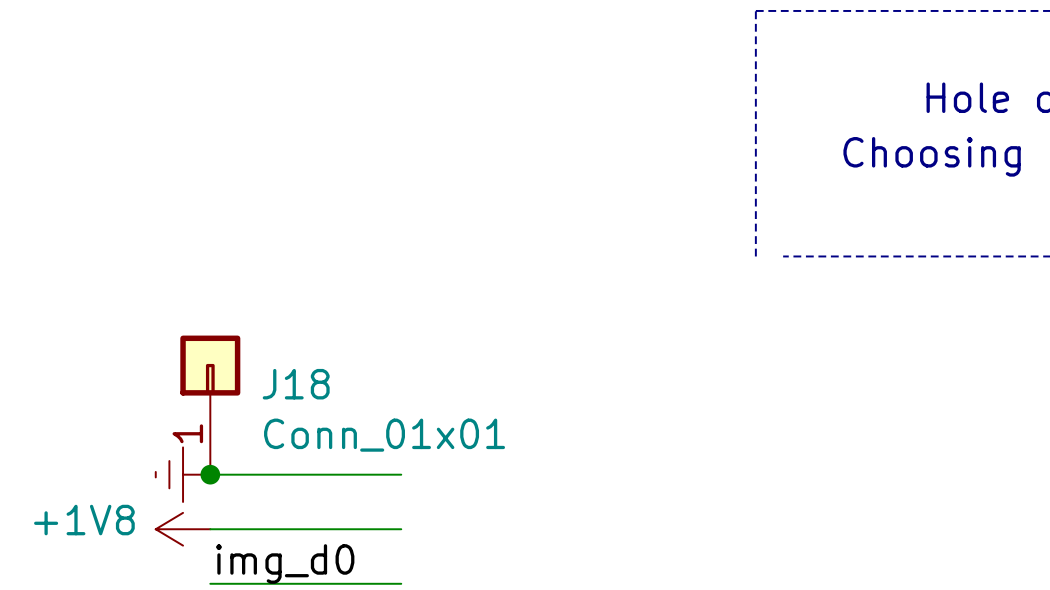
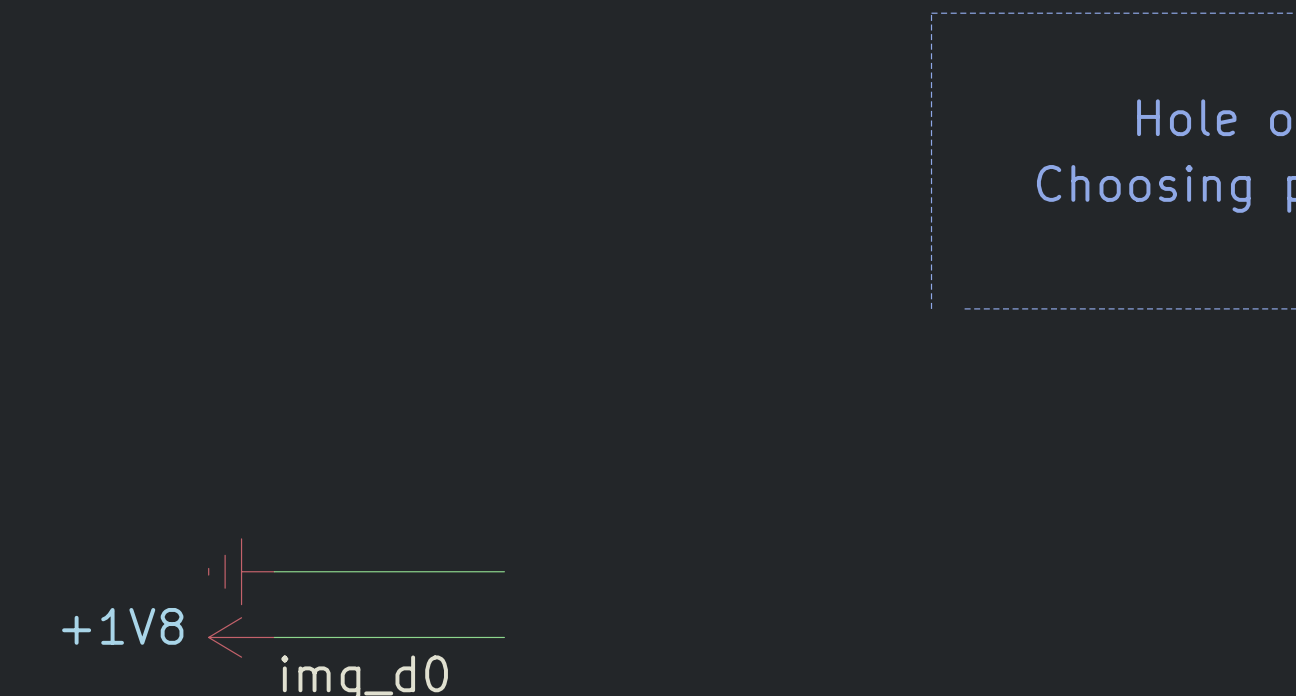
J18: Conn_01x01 (210, 405) -> none
junction: (210, 474) -> none

